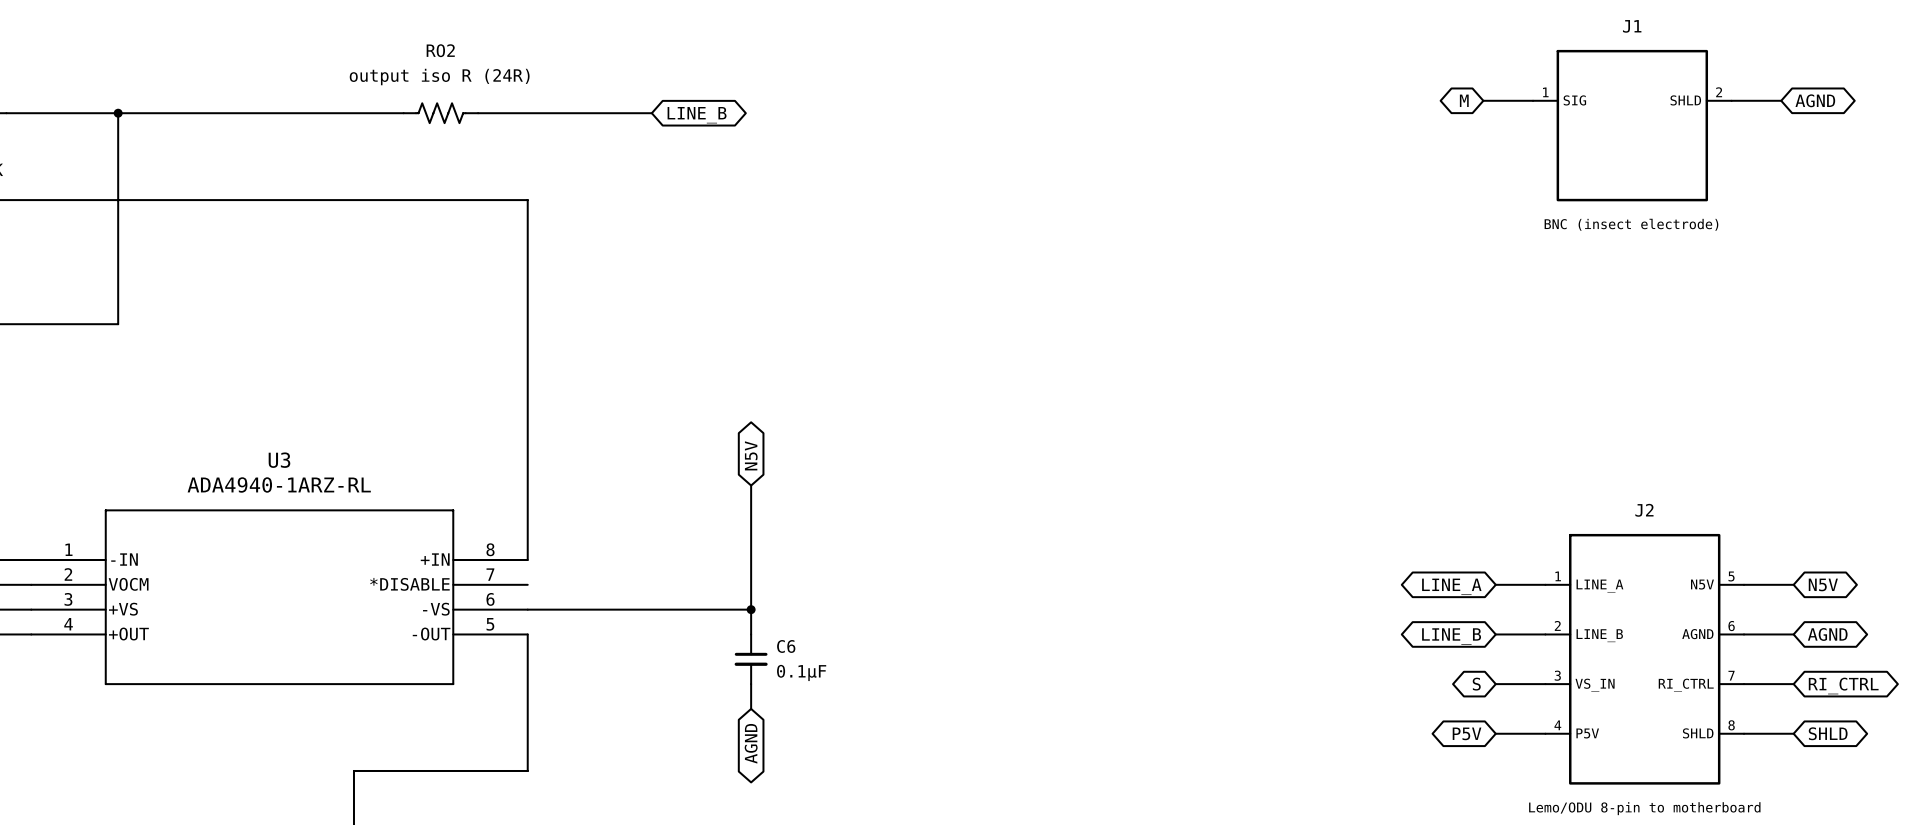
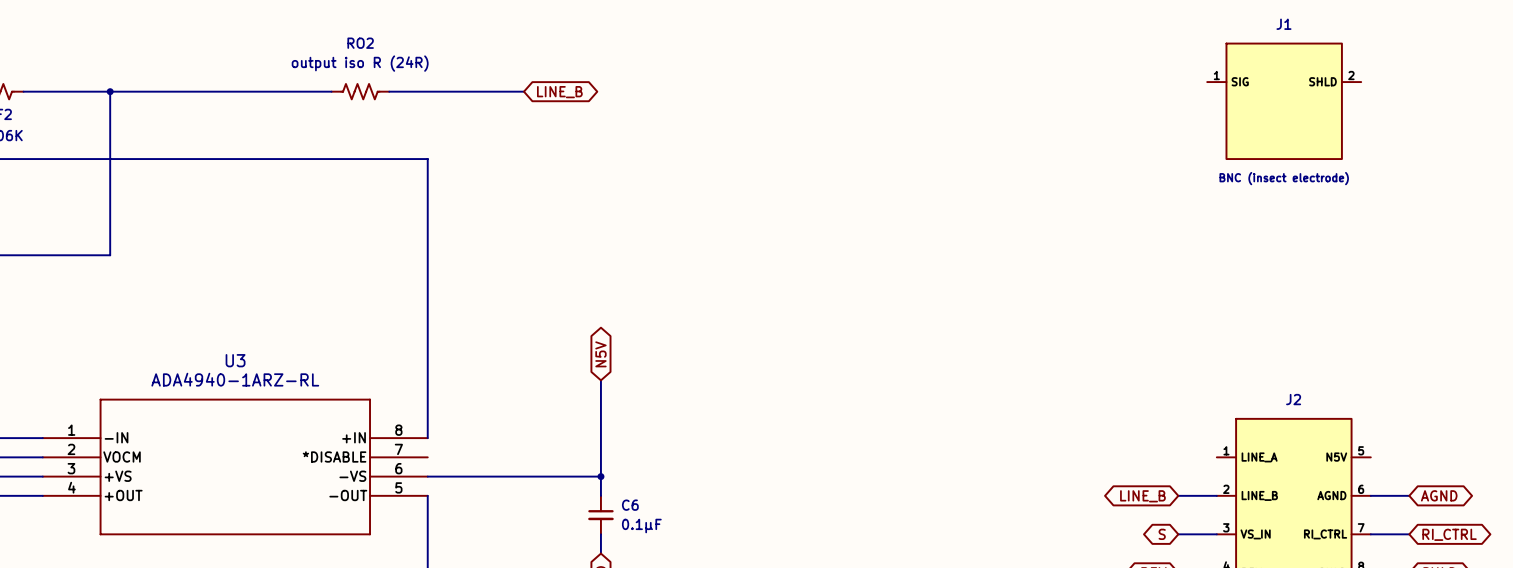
global label: M (1464, 100) -> none
wire: (1483, 100) (1533, 100) -> none
wire: (1731, 100) (1781, 100) -> none
global label: AGND (1815, 100) -> none
wire: (1495, 584) (1545, 584) -> none
wire: (1744, 584) (1793, 584) -> none
global label: N5V (1823, 584) -> none
global label: LINE_A (1451, 586) -> none

